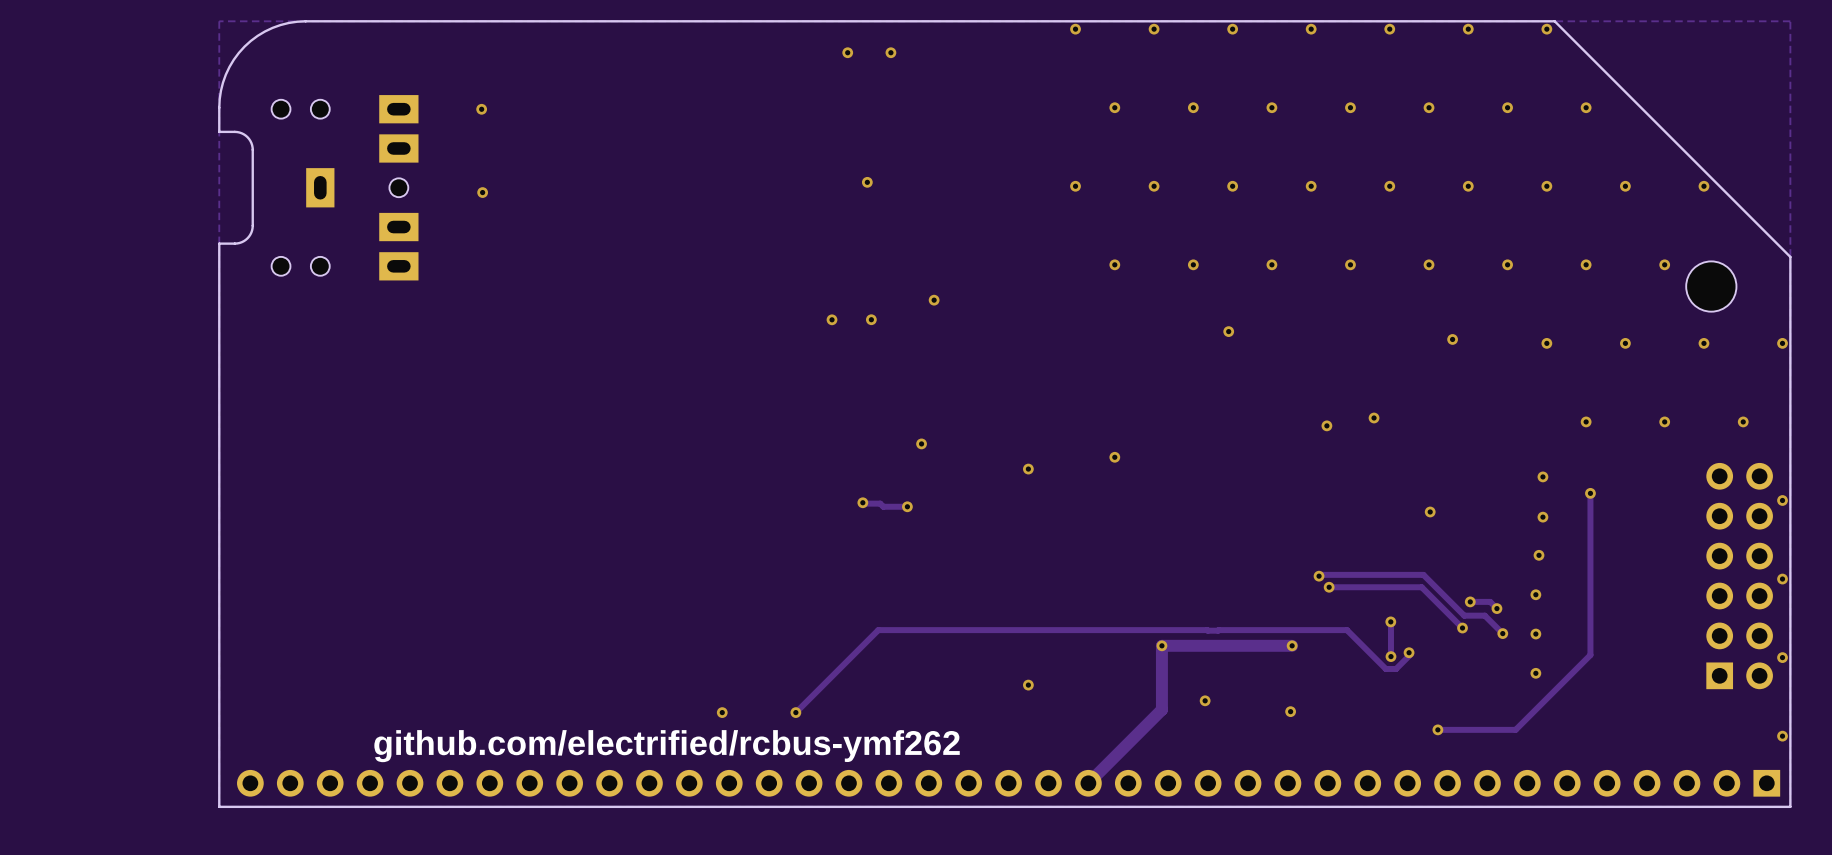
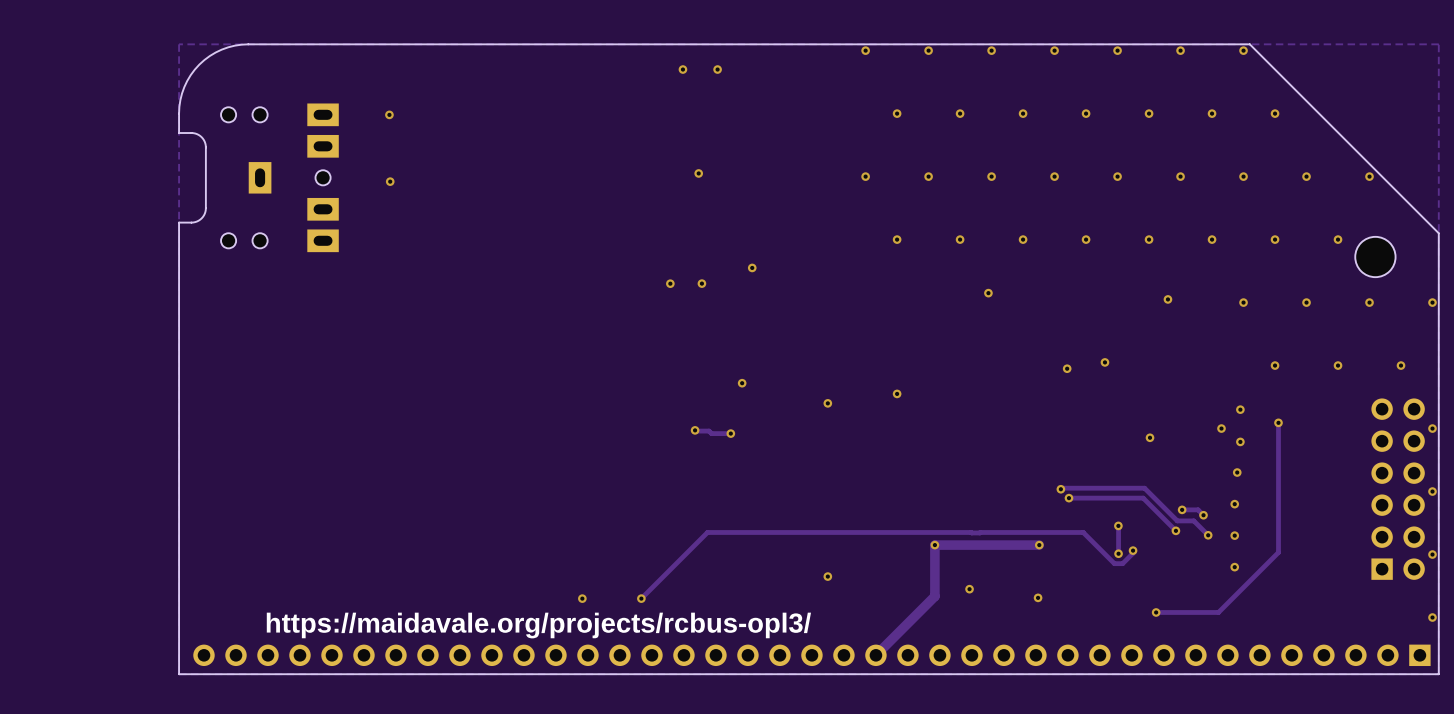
via: none -> (1221, 428)
text: github.com/electrified/rcbus-ymf262 (667, 746) -> https://maidavale.org/projects/rcbus-opl3/ (538, 625)

